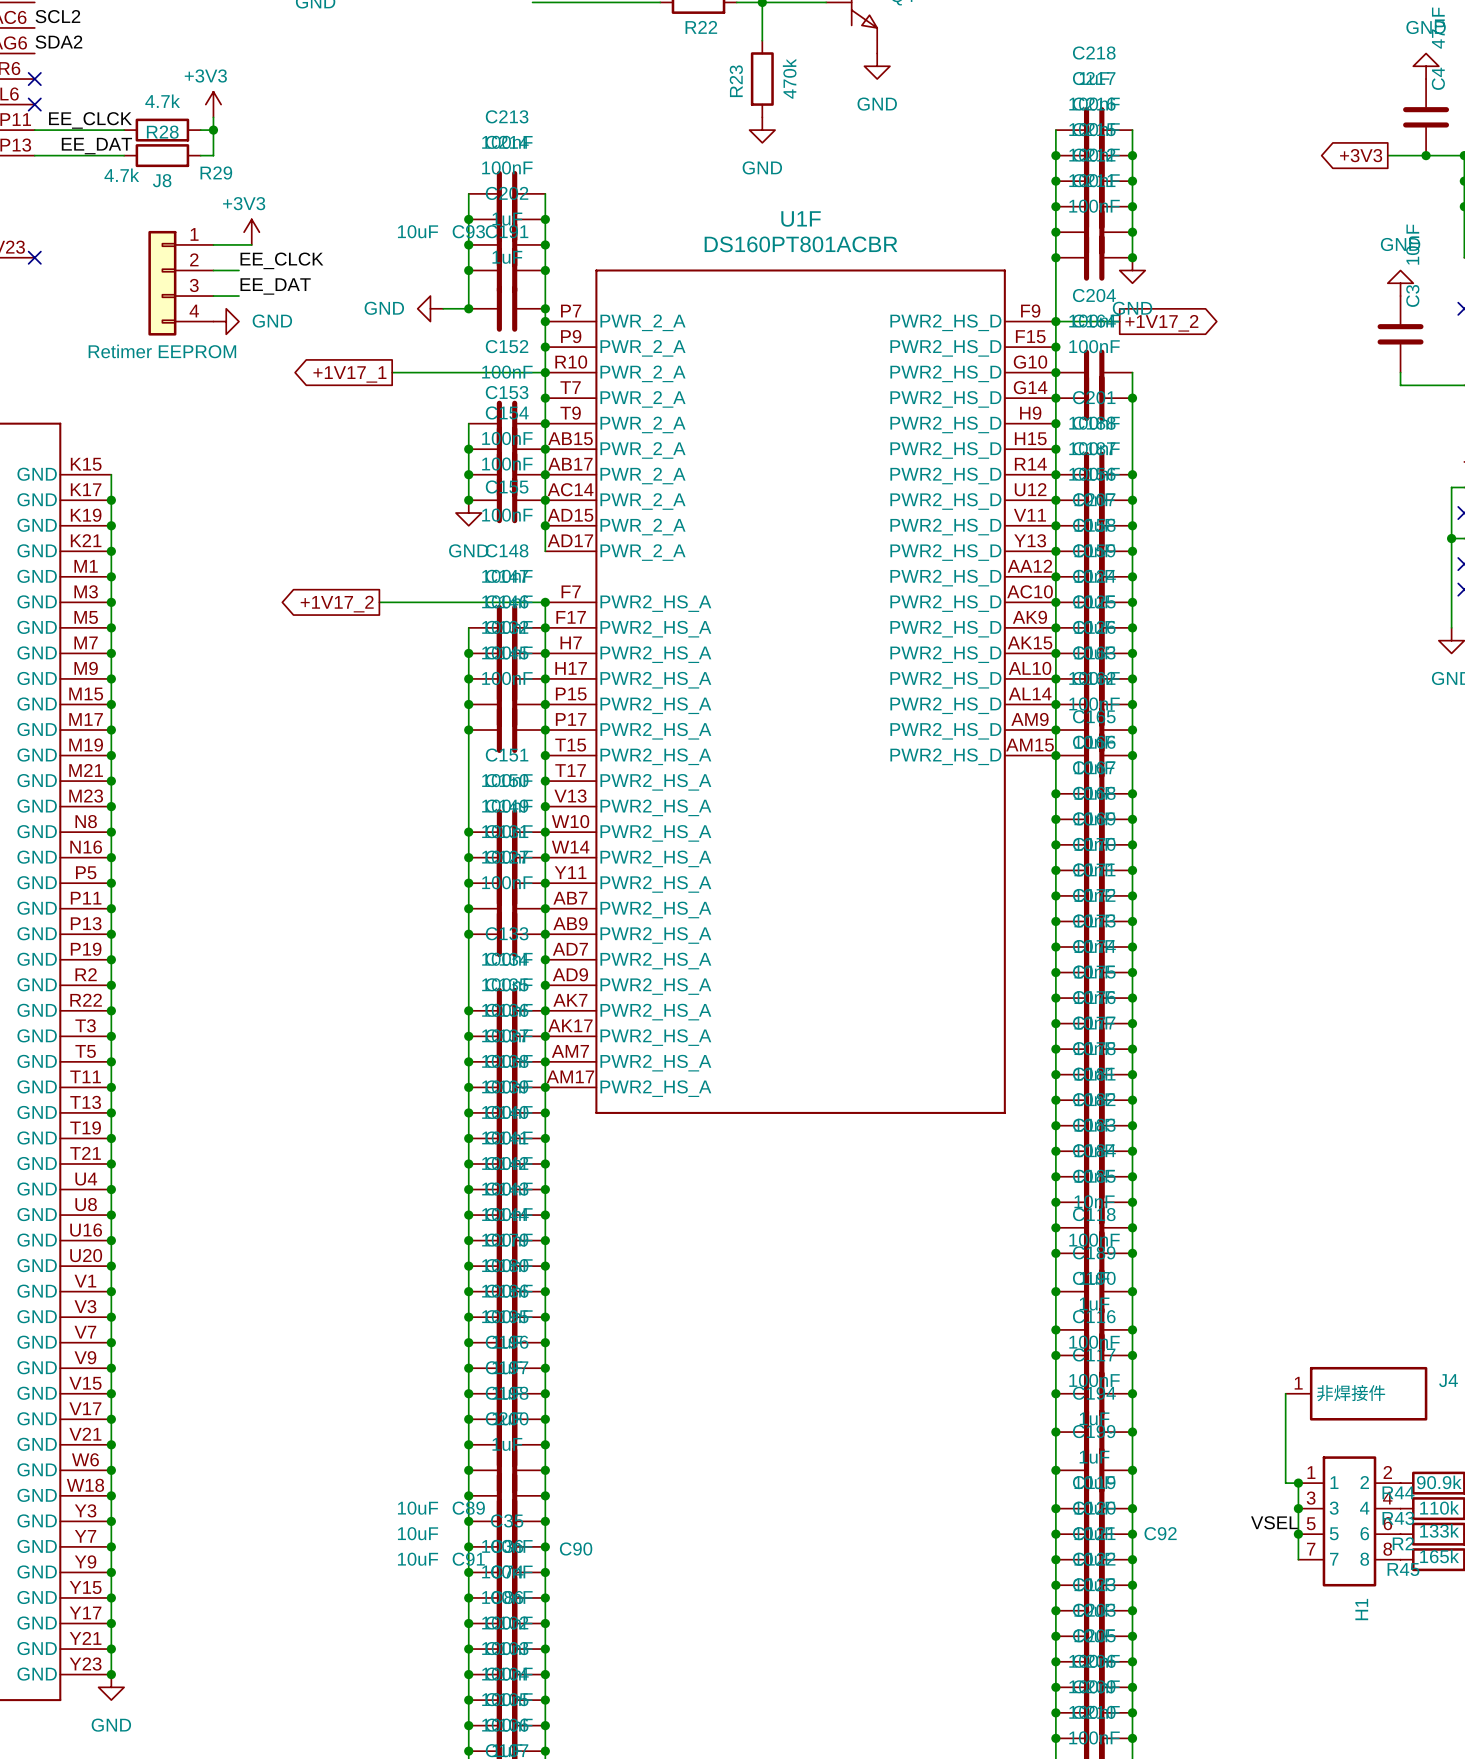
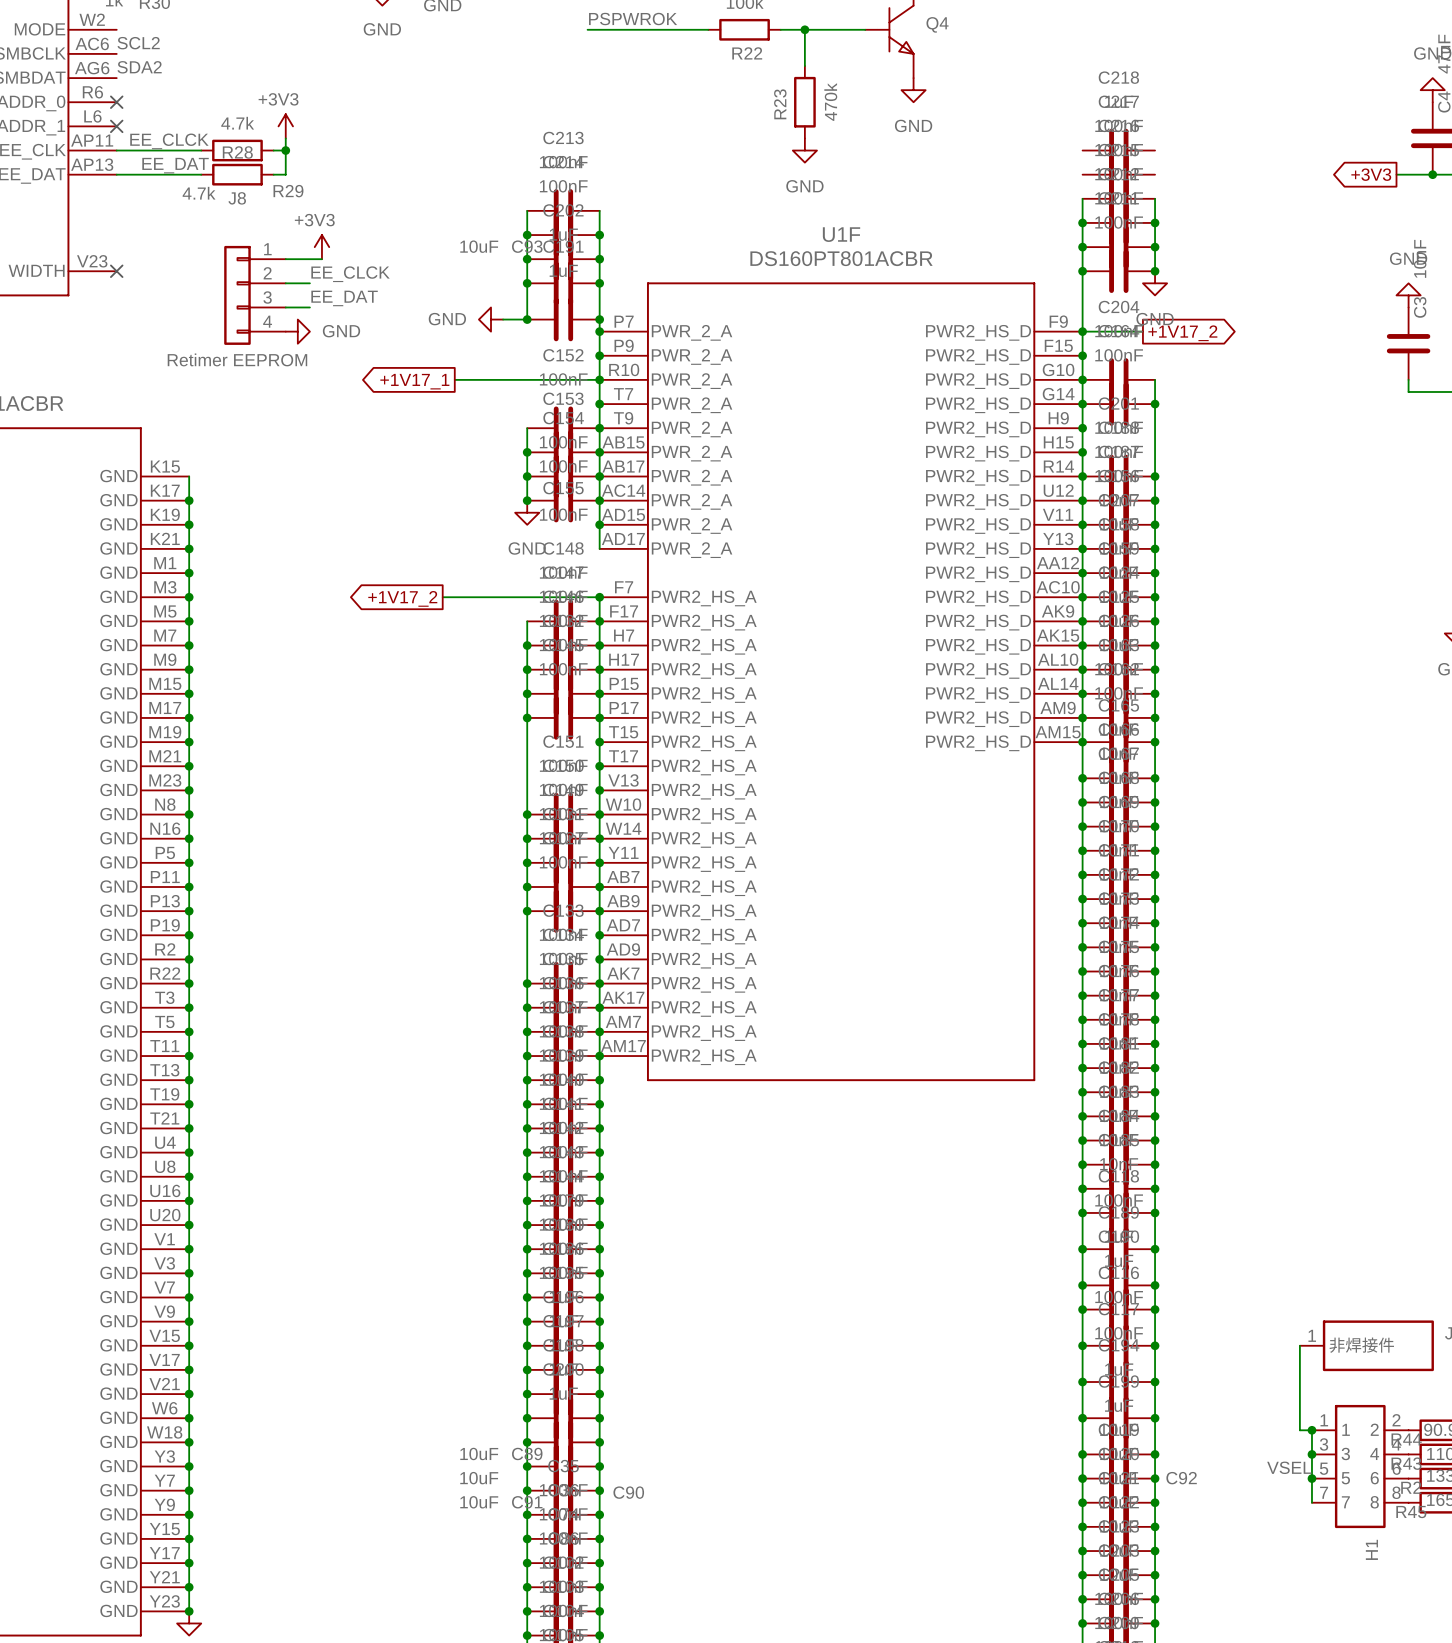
wire: (1055, 130) (1055, 181) -> none
wire: (1132, 130) (1132, 181) -> none
junction: (1055, 155) -> none
junction: (1132, 155) -> none
junction: (1055, 181) -> none
junction: (1132, 181) -> none

